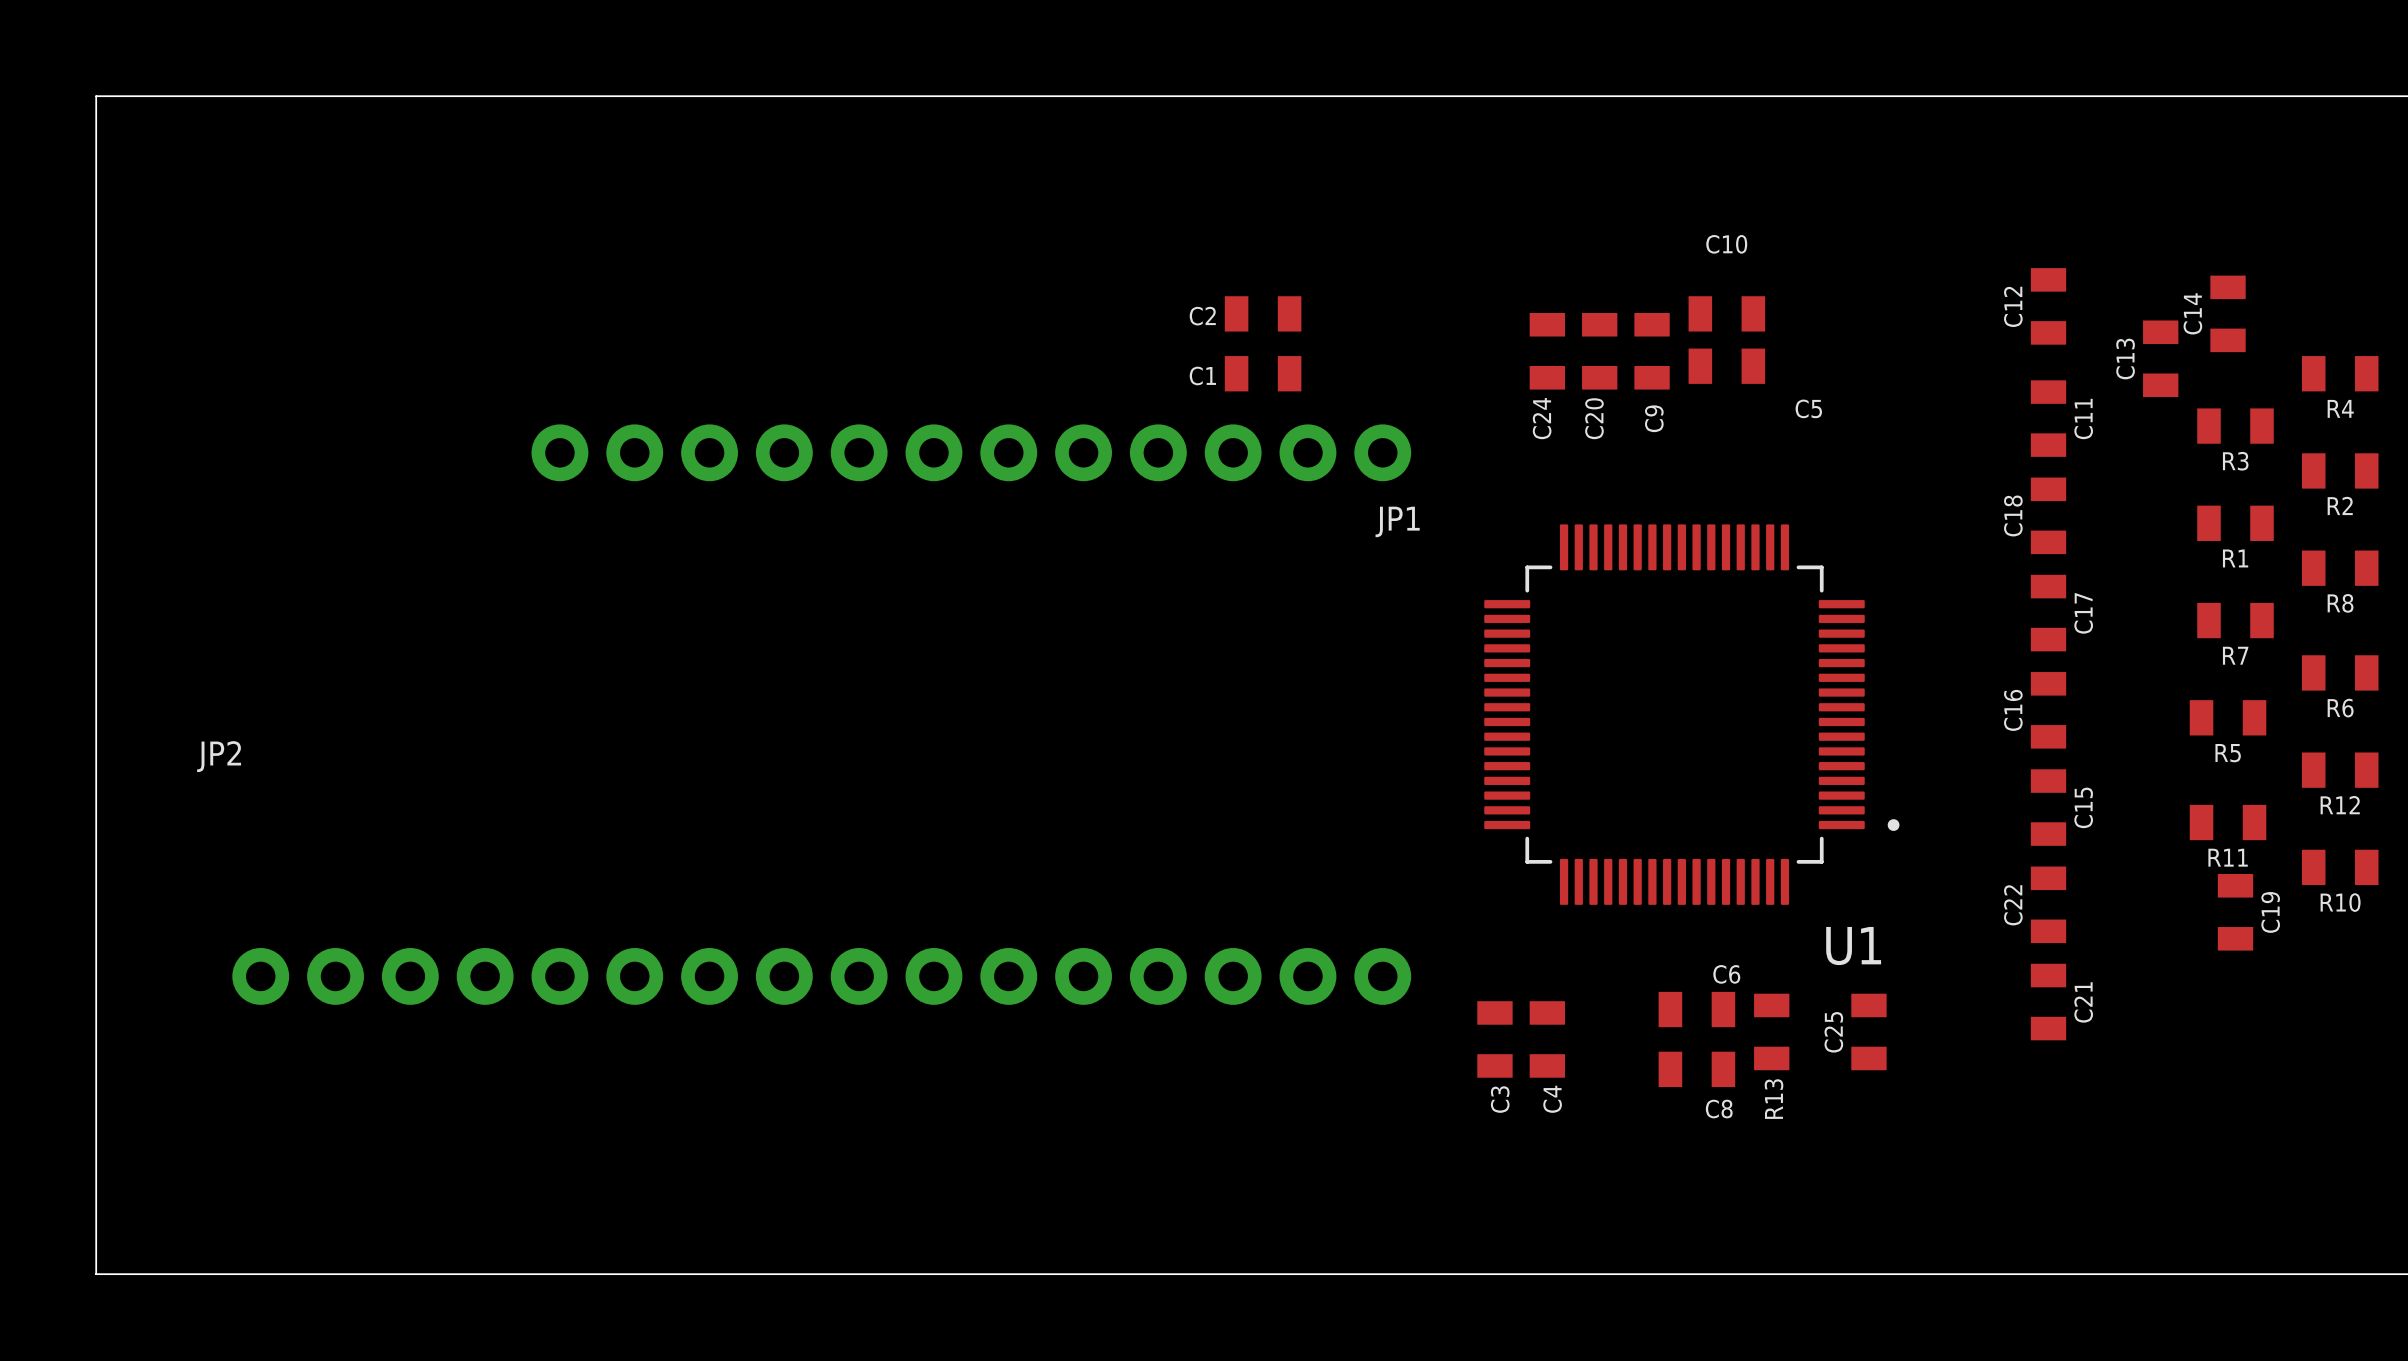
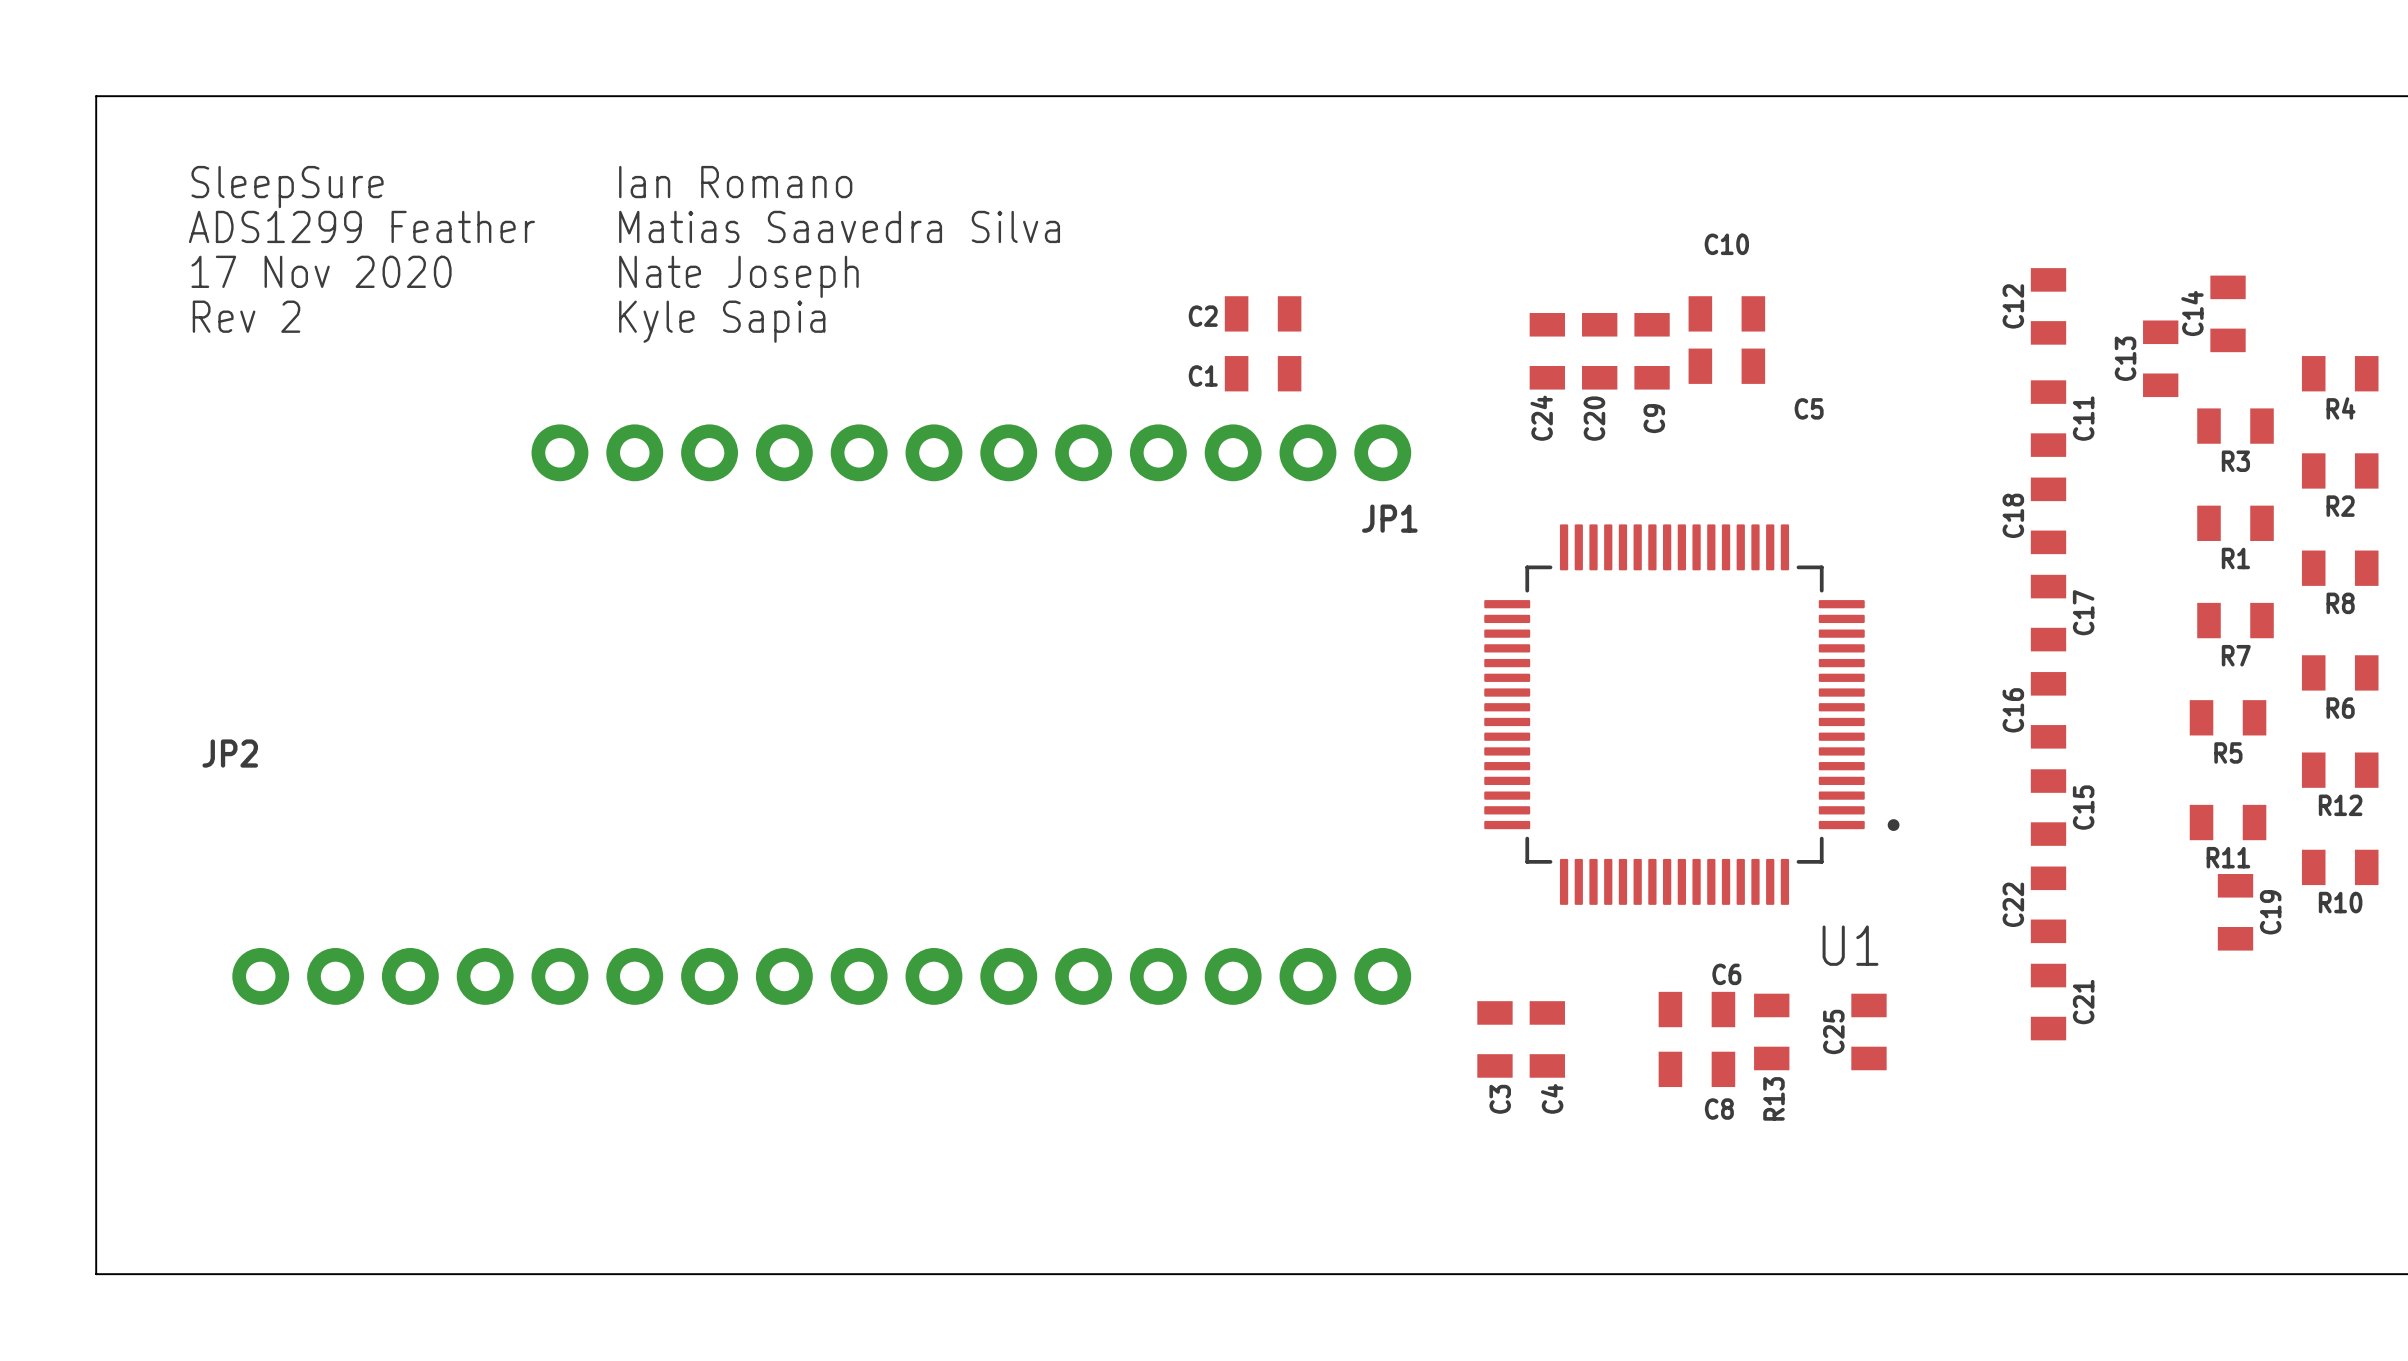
text: none -> Ian Romano (735, 182)
text: none -> SleepSure (287, 187)
text: none -> ADS1299 Feather (361, 226)
text: none -> Matias Saavedra Silva (839, 226)
text: none -> 17 Nov 2020 (321, 271)
text: none -> Nate Joseph (738, 276)
text: none -> Rev 2 (246, 316)
text: none -> Kyle Sapia (722, 321)

